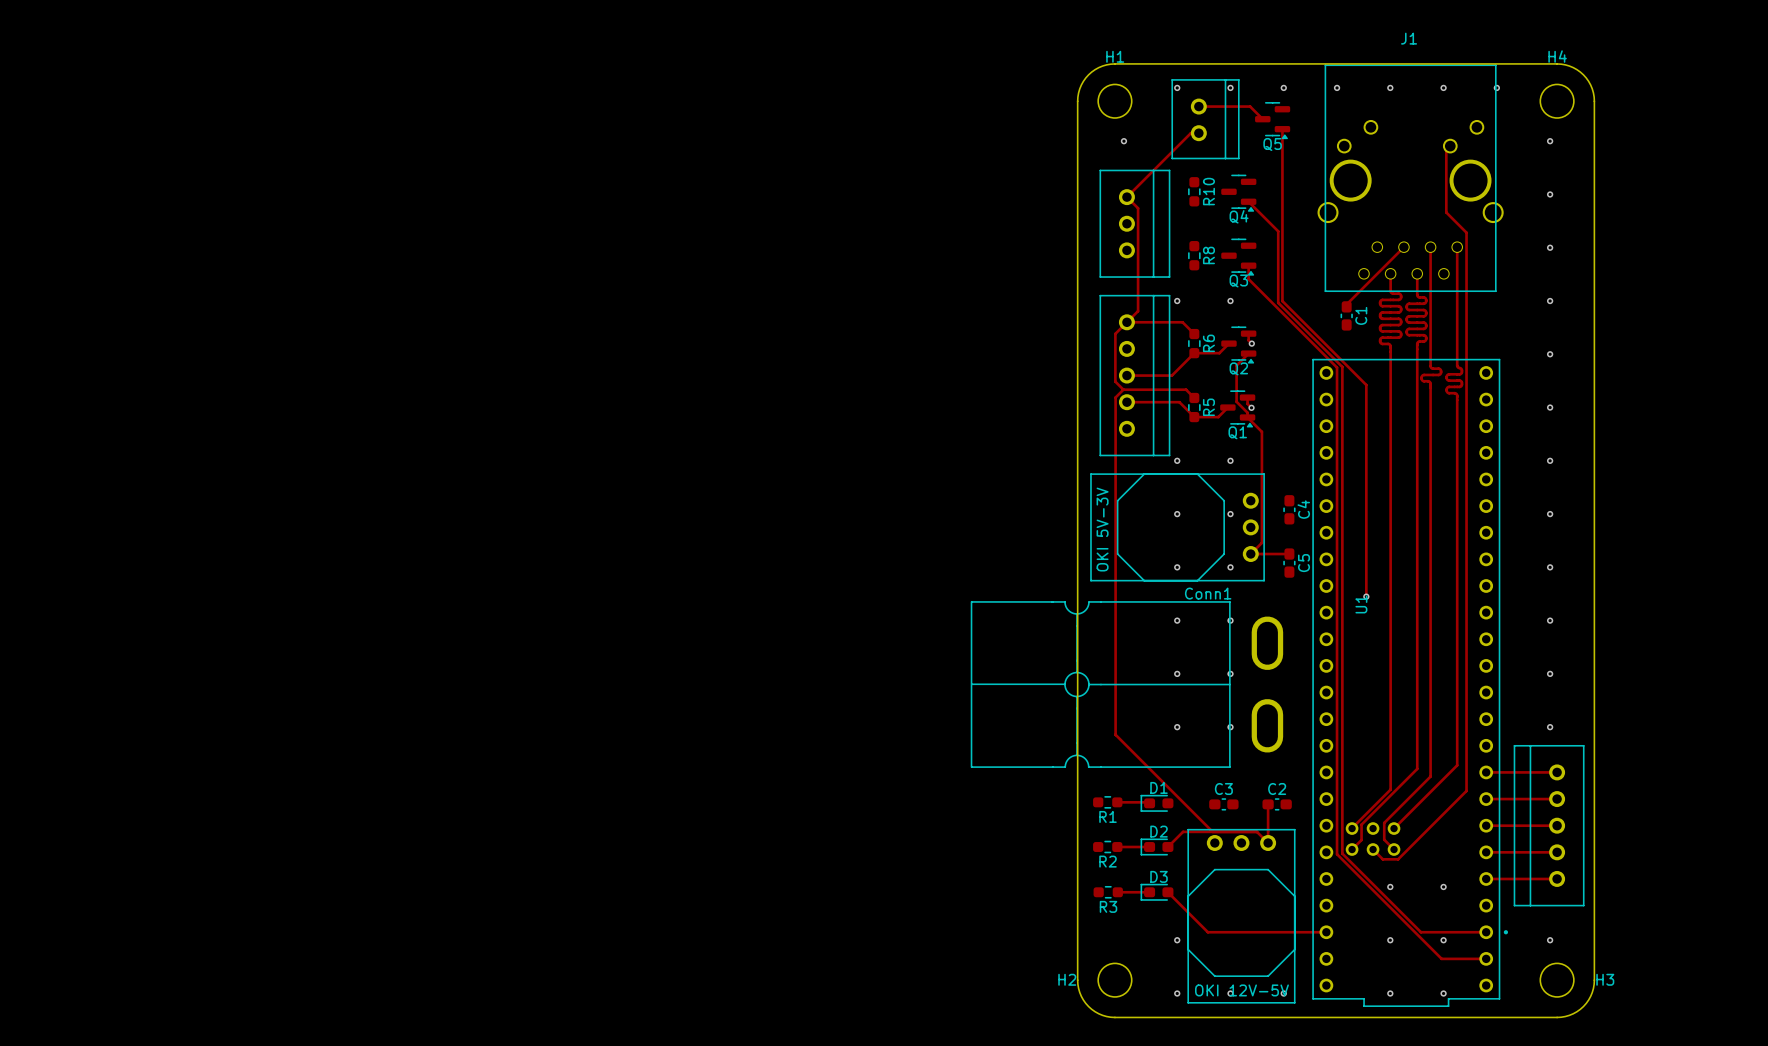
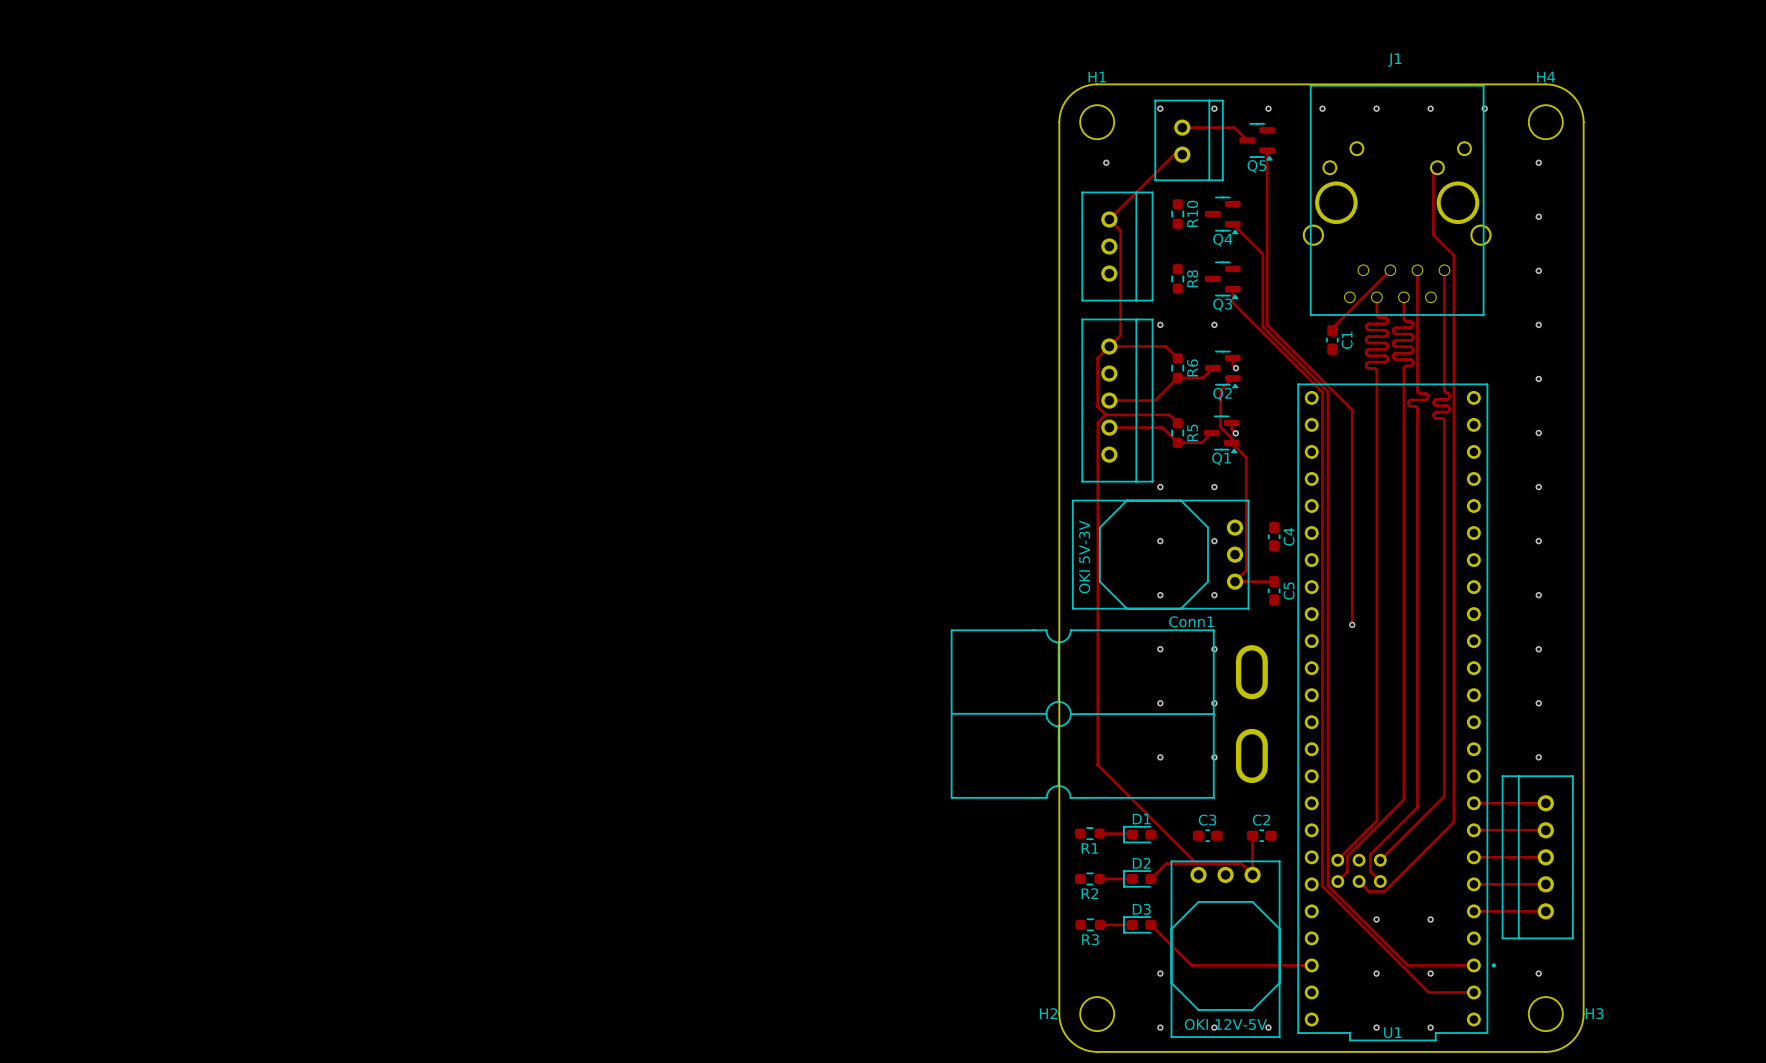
U1 name rotation: 0° (1361, 604) -> 90° clockwise (1392, 1032)
U1 name position: U1 (1361, 604) -> U1 (1392, 1032)

